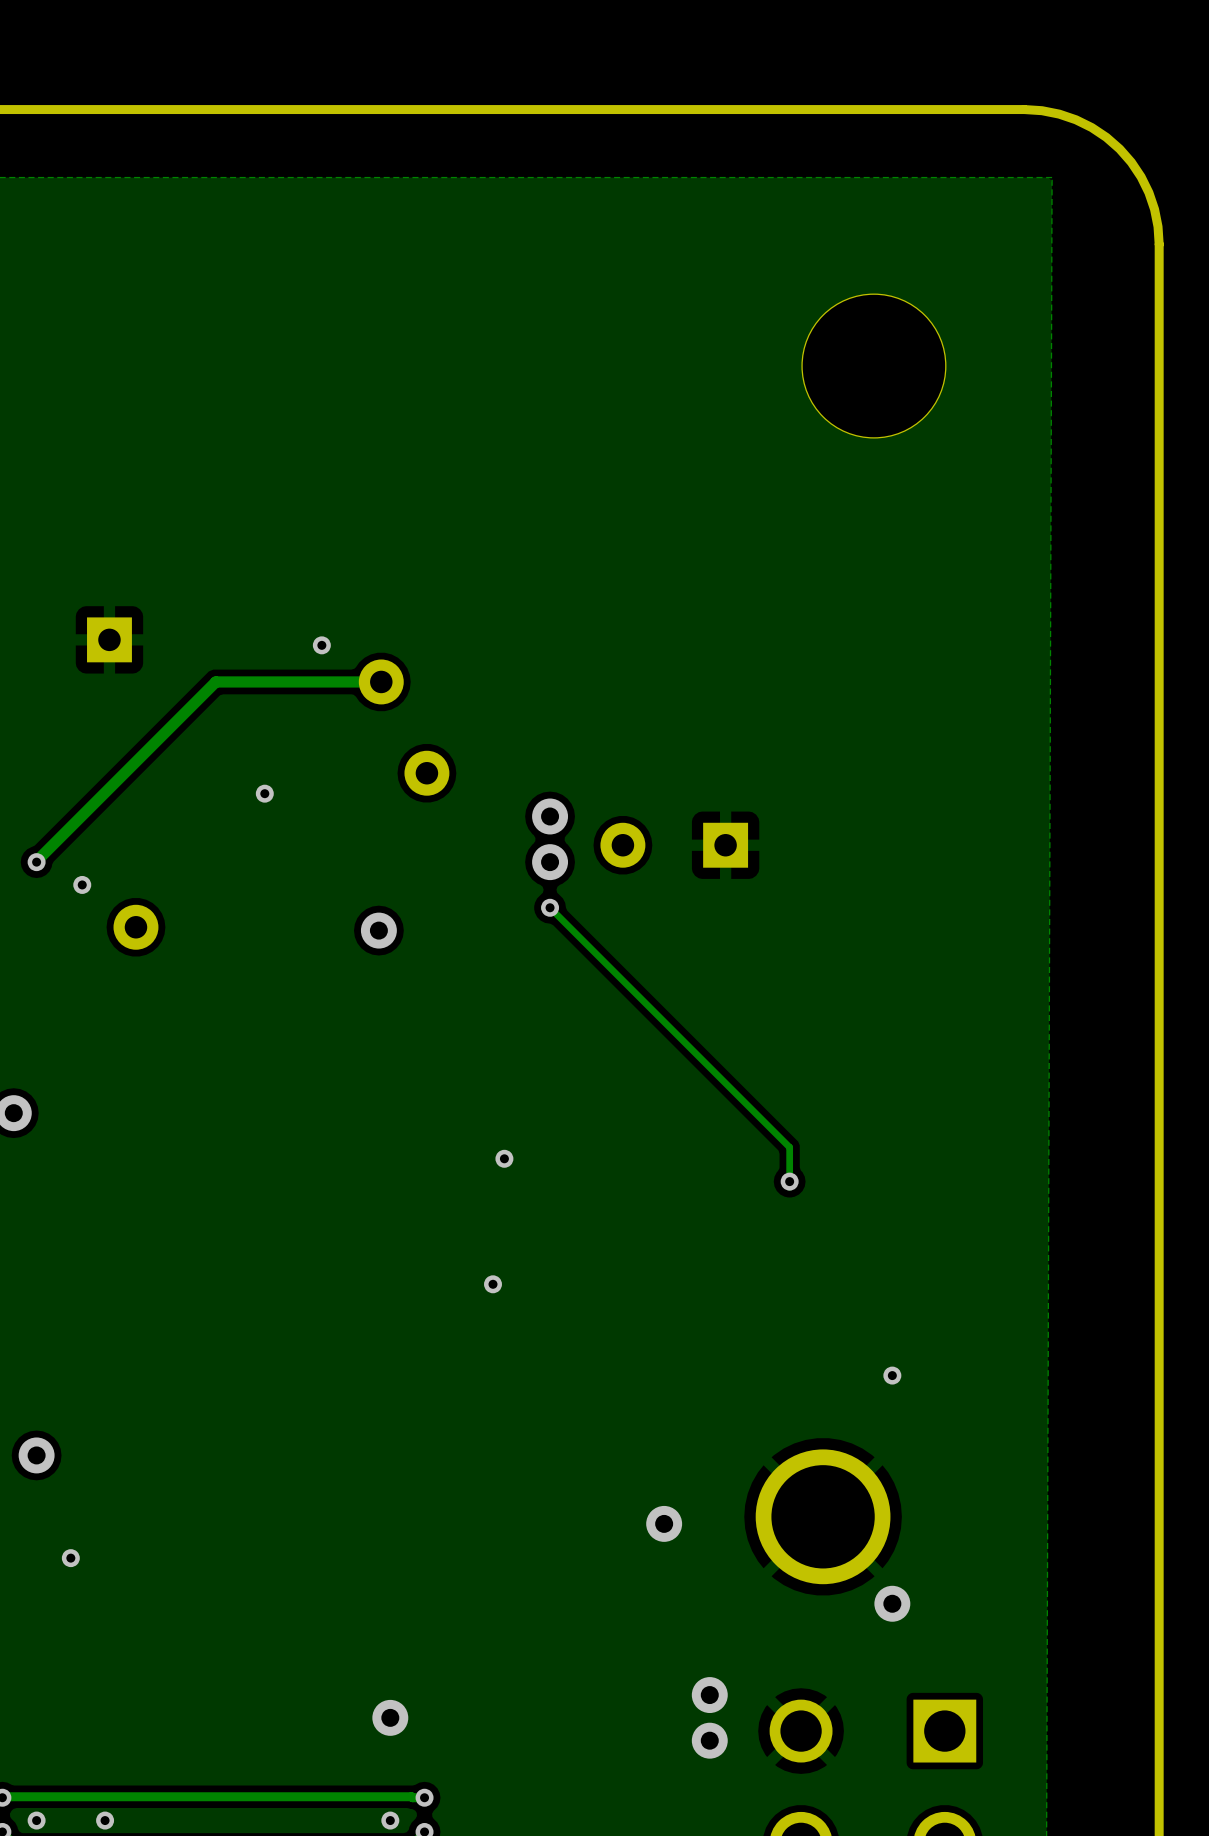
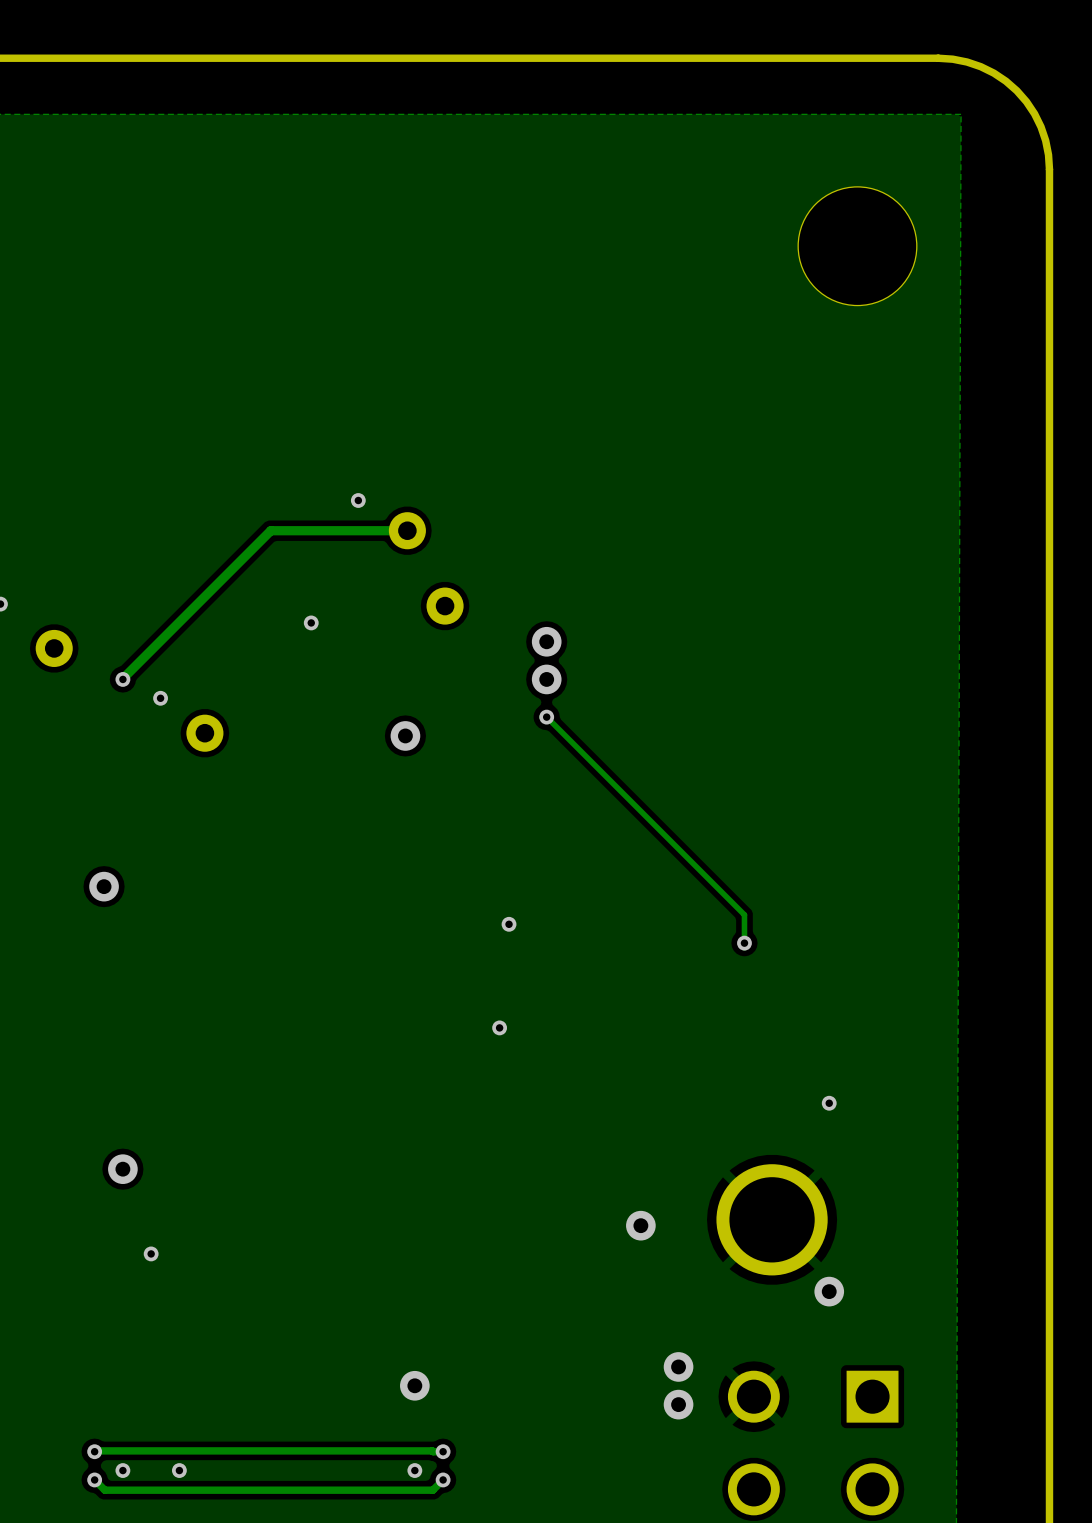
part position: (873, 366) -> (857, 246)
part: (109, 639) -> none
part: (622, 845) -> none
part: (725, 845) -> none

